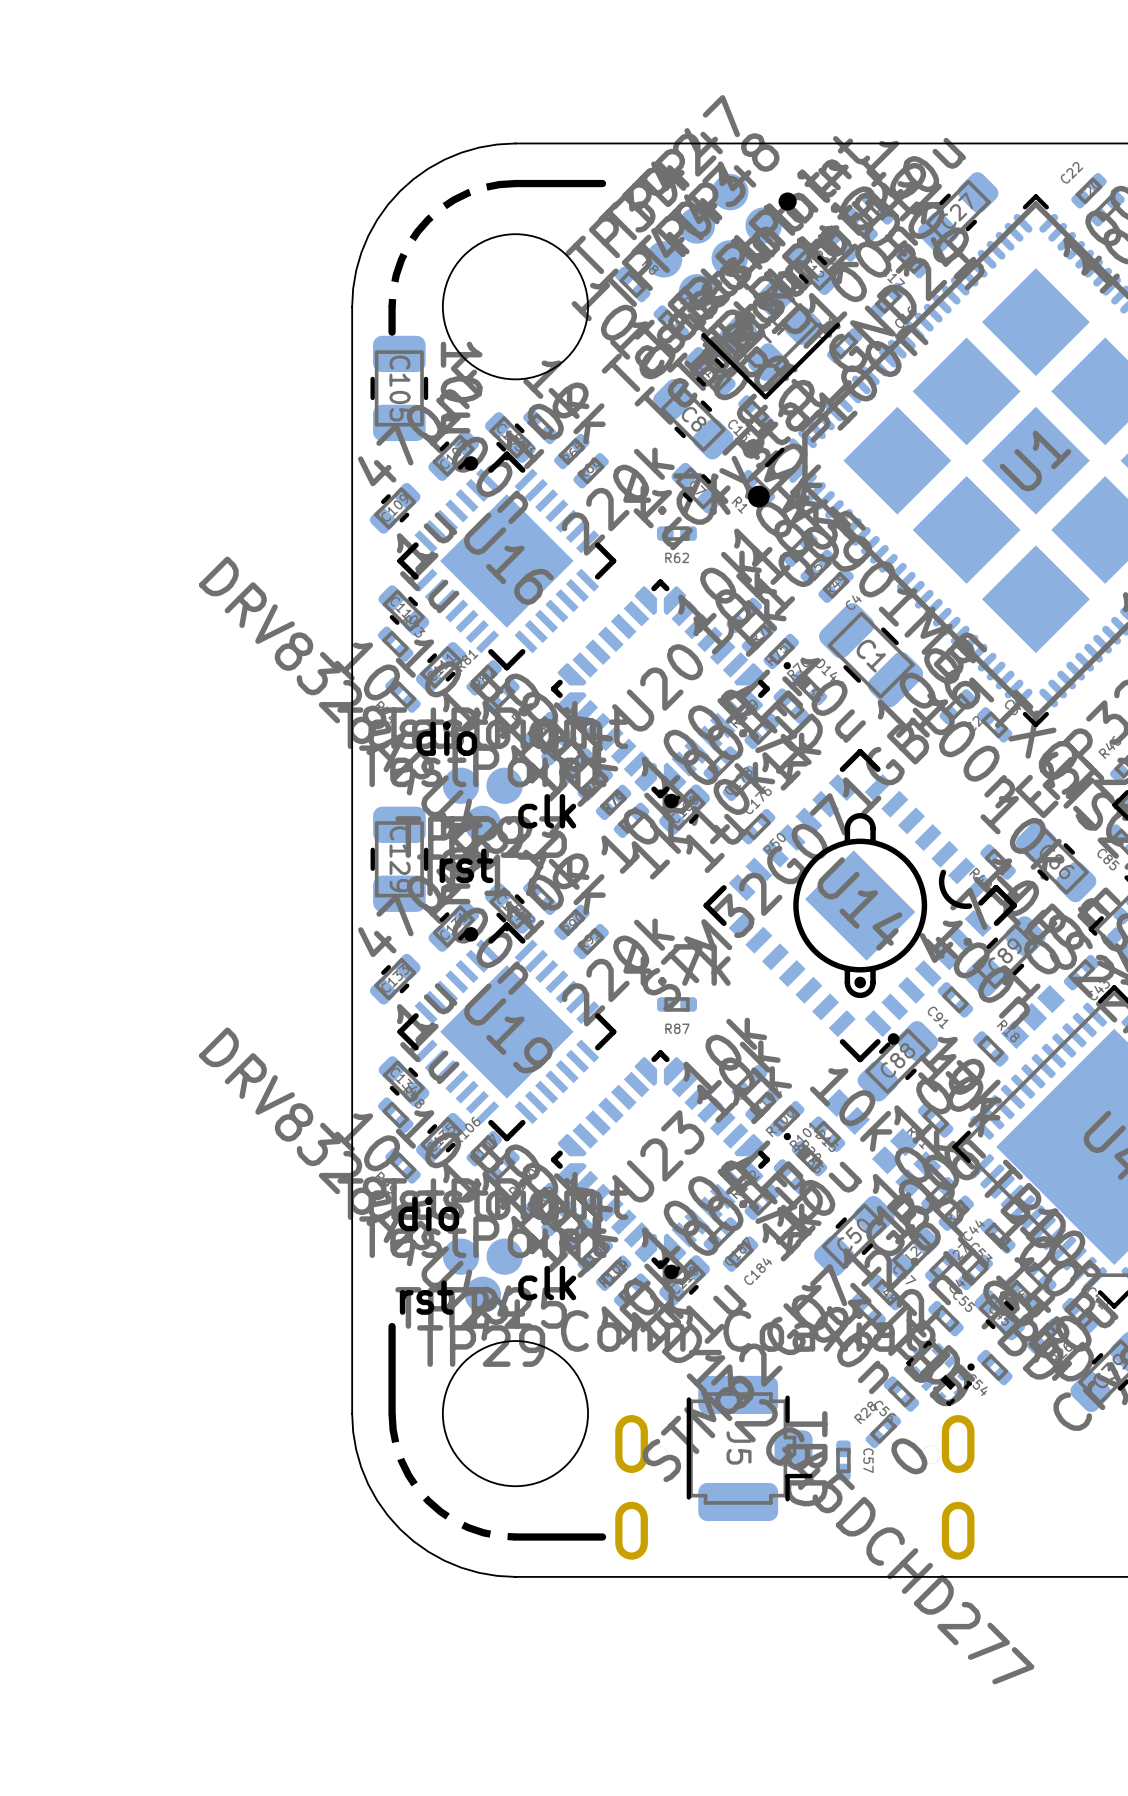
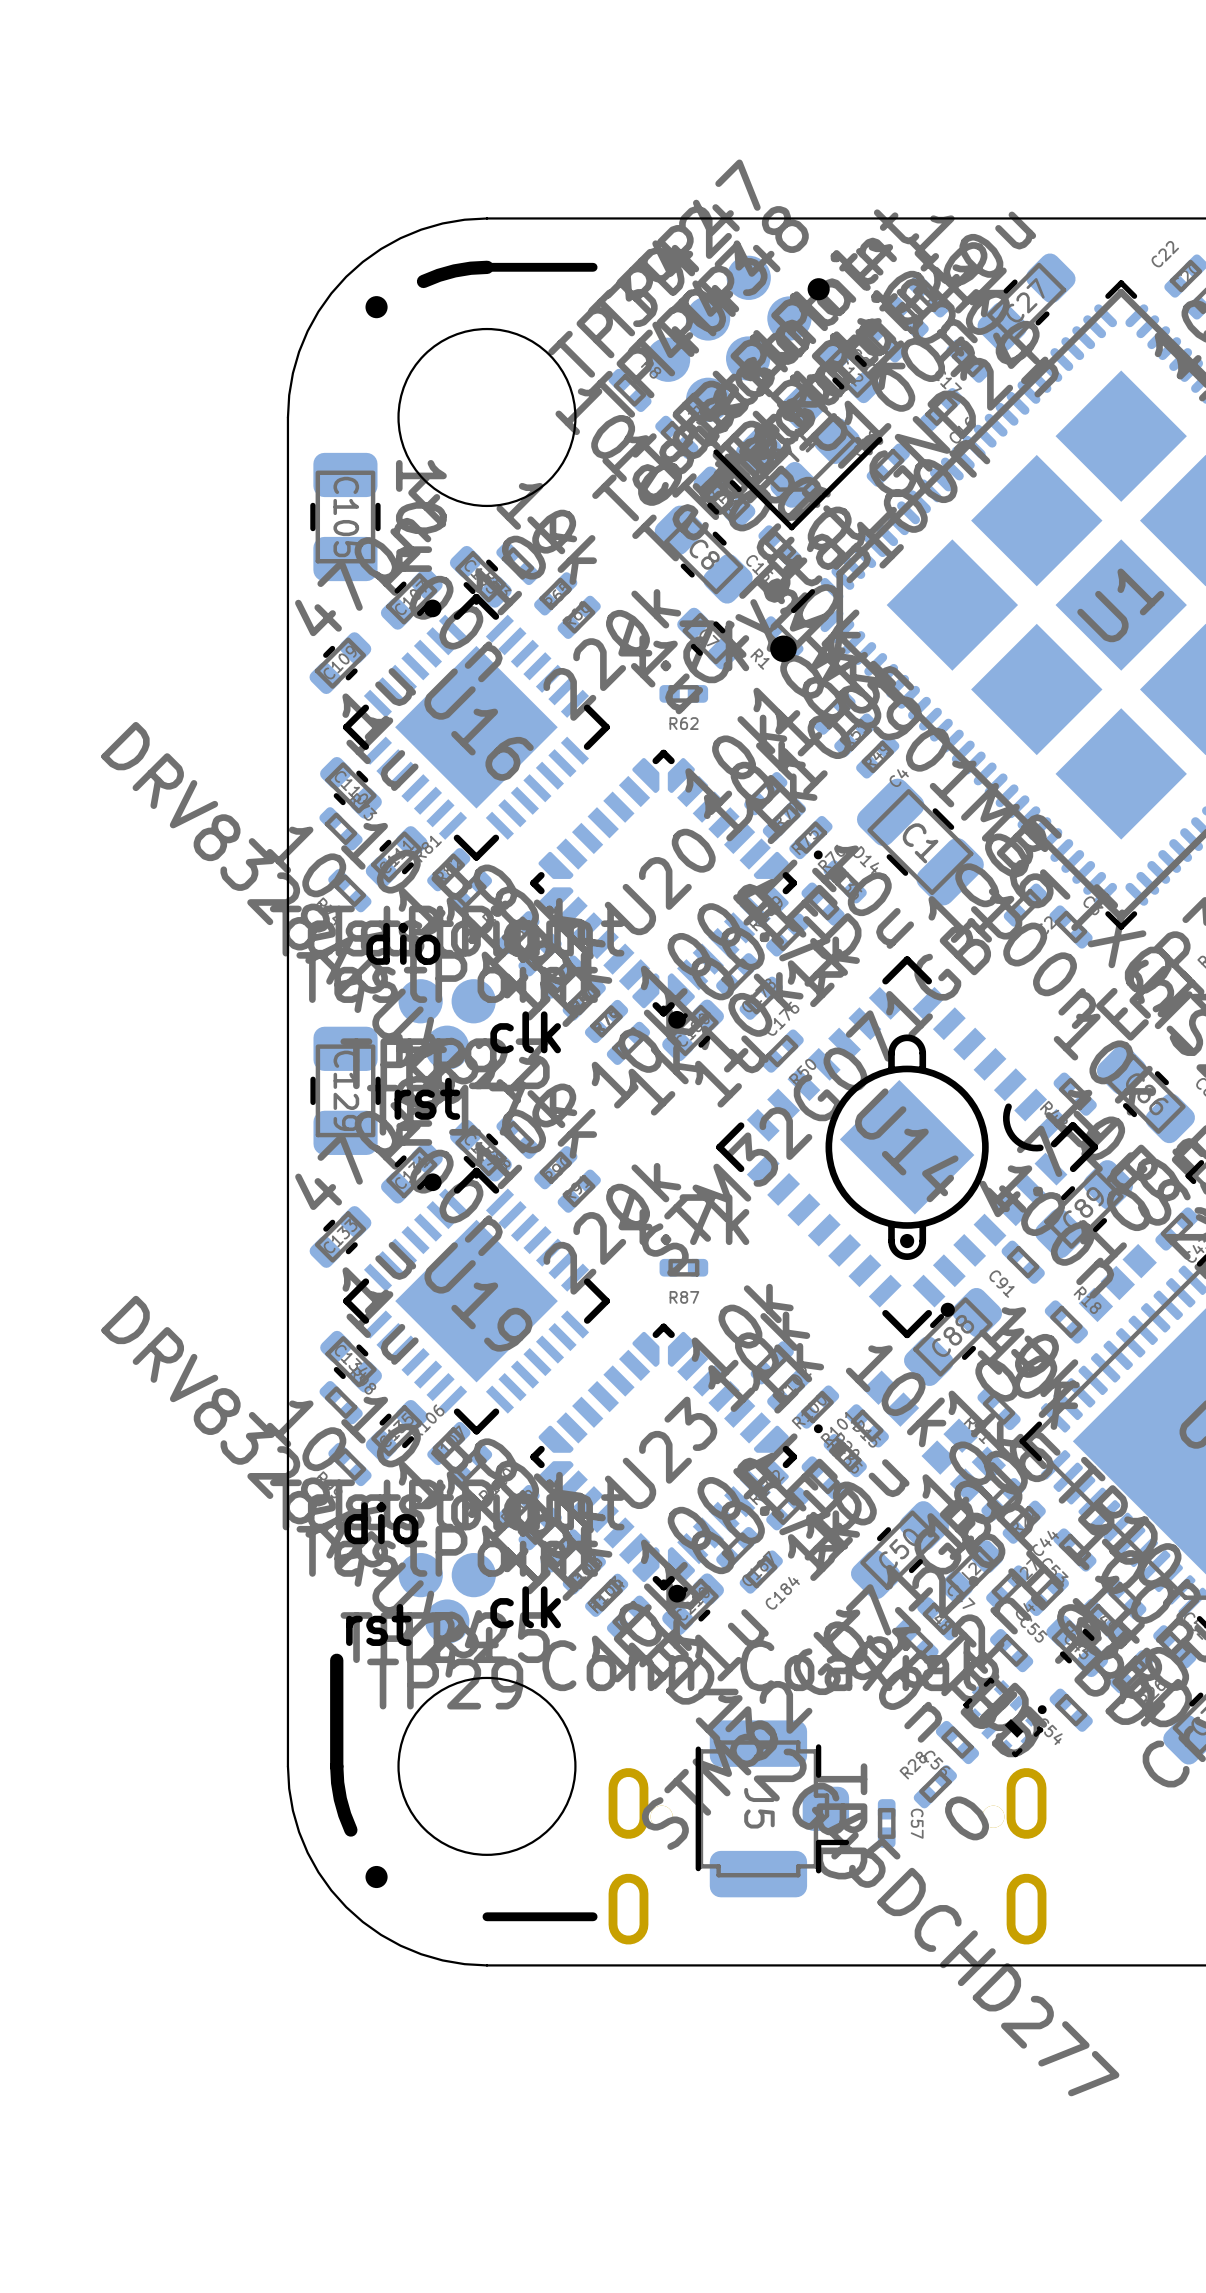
line: (515, 183) (483, 187) (453, 200) (428, 219) (417, 231) (401, 259) (396, 274) (393, 290) (392, 332) -> (487, 267) (454, 270) (423, 281)
drawing: none -> [365, 296, 388, 319]
line: (392, 1326) (393, 1429) (401, 1460) (408, 1475) (428, 1500) (453, 1520) (483, 1532) (515, 1537) -> (336, 1660) (337, 1782) (340, 1799) (350, 1830)
drawing: none -> [365, 1865, 388, 1889]

